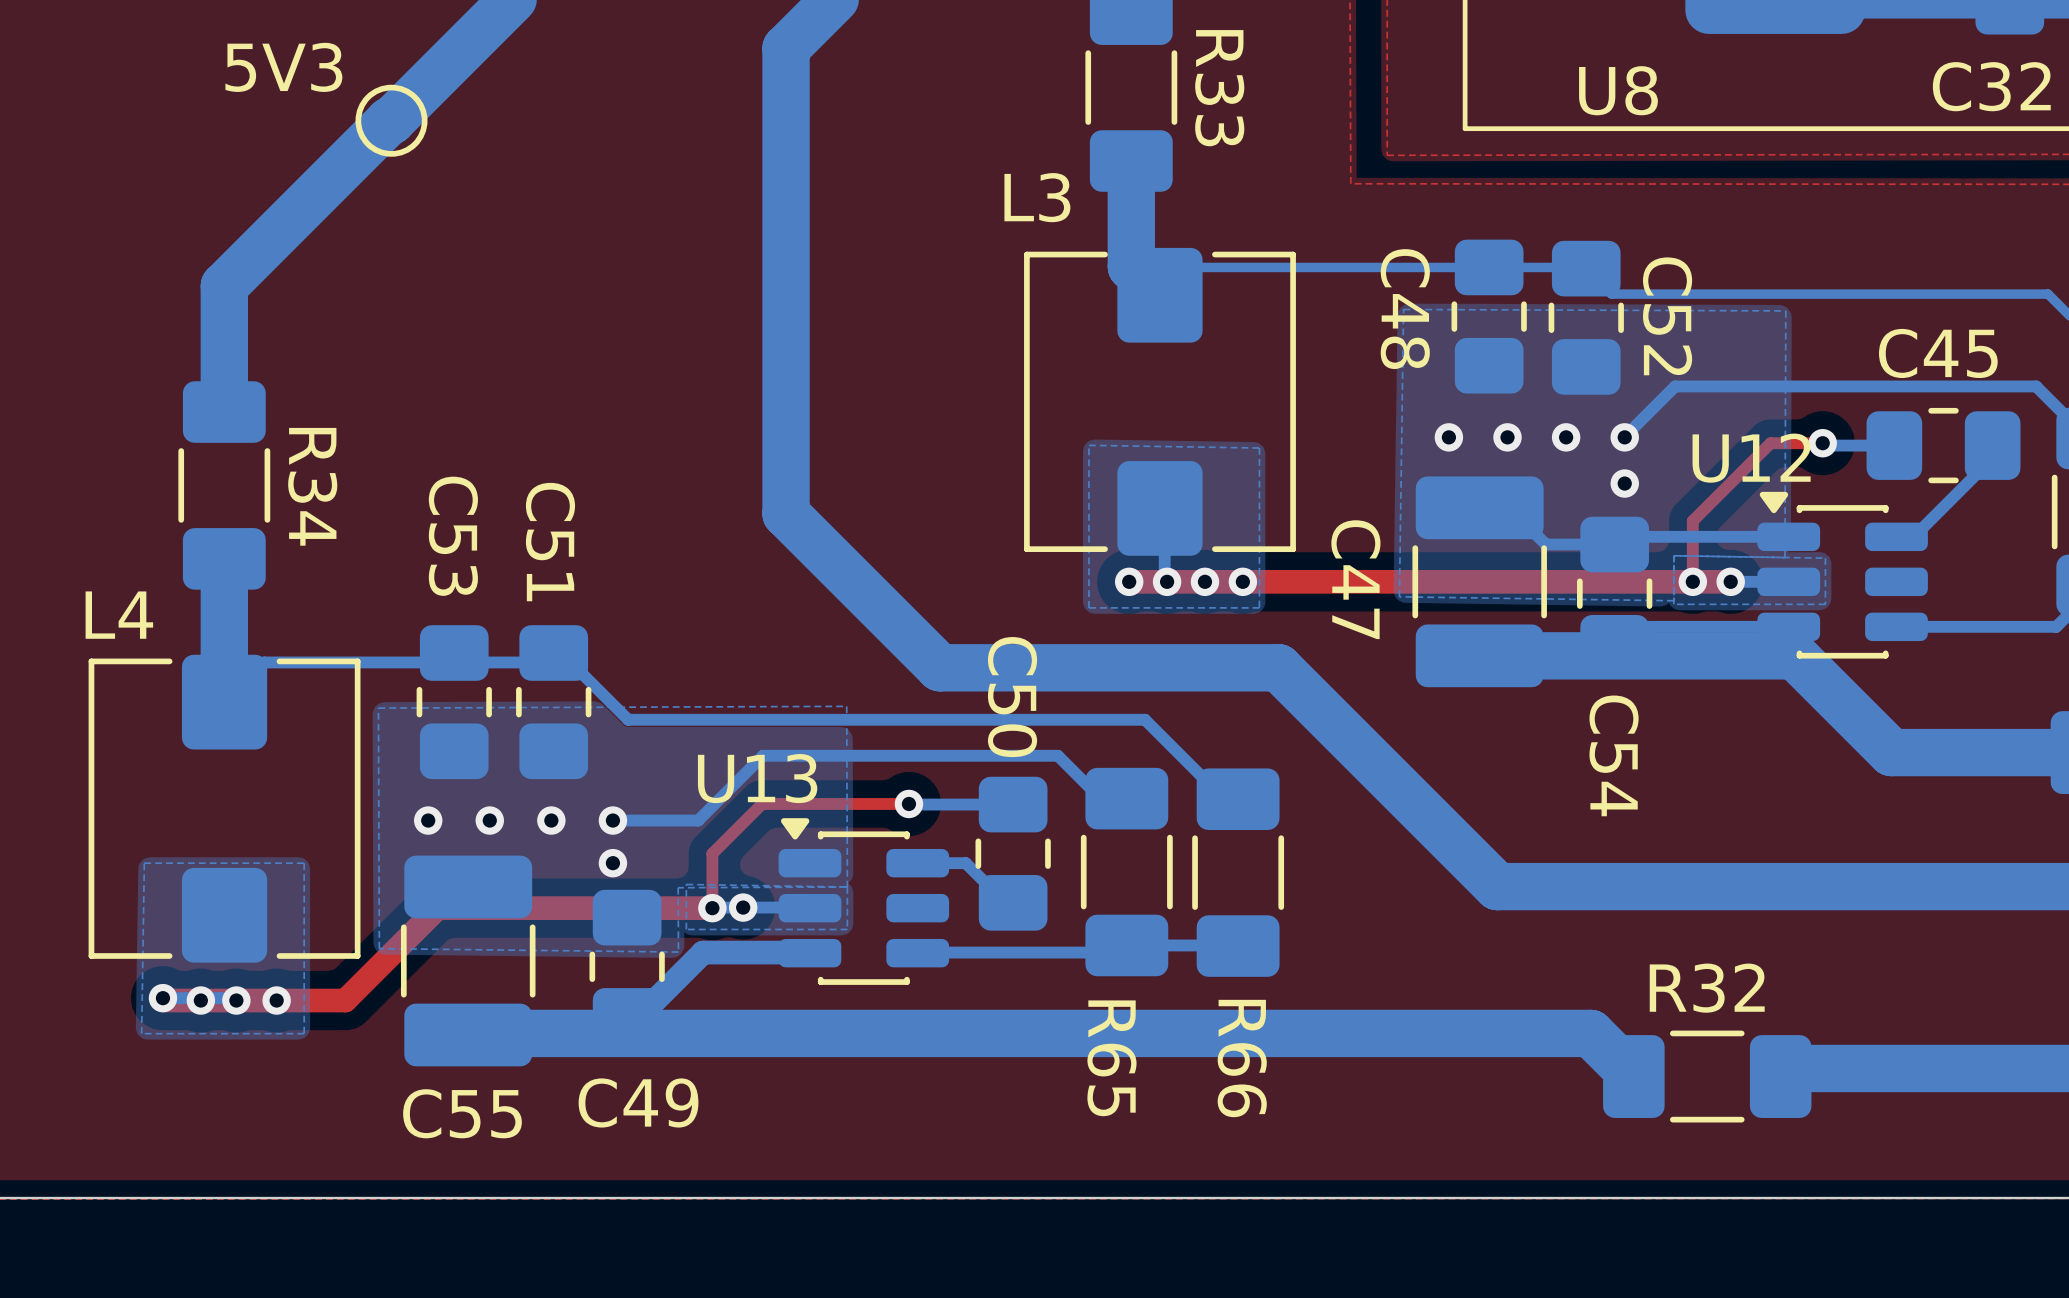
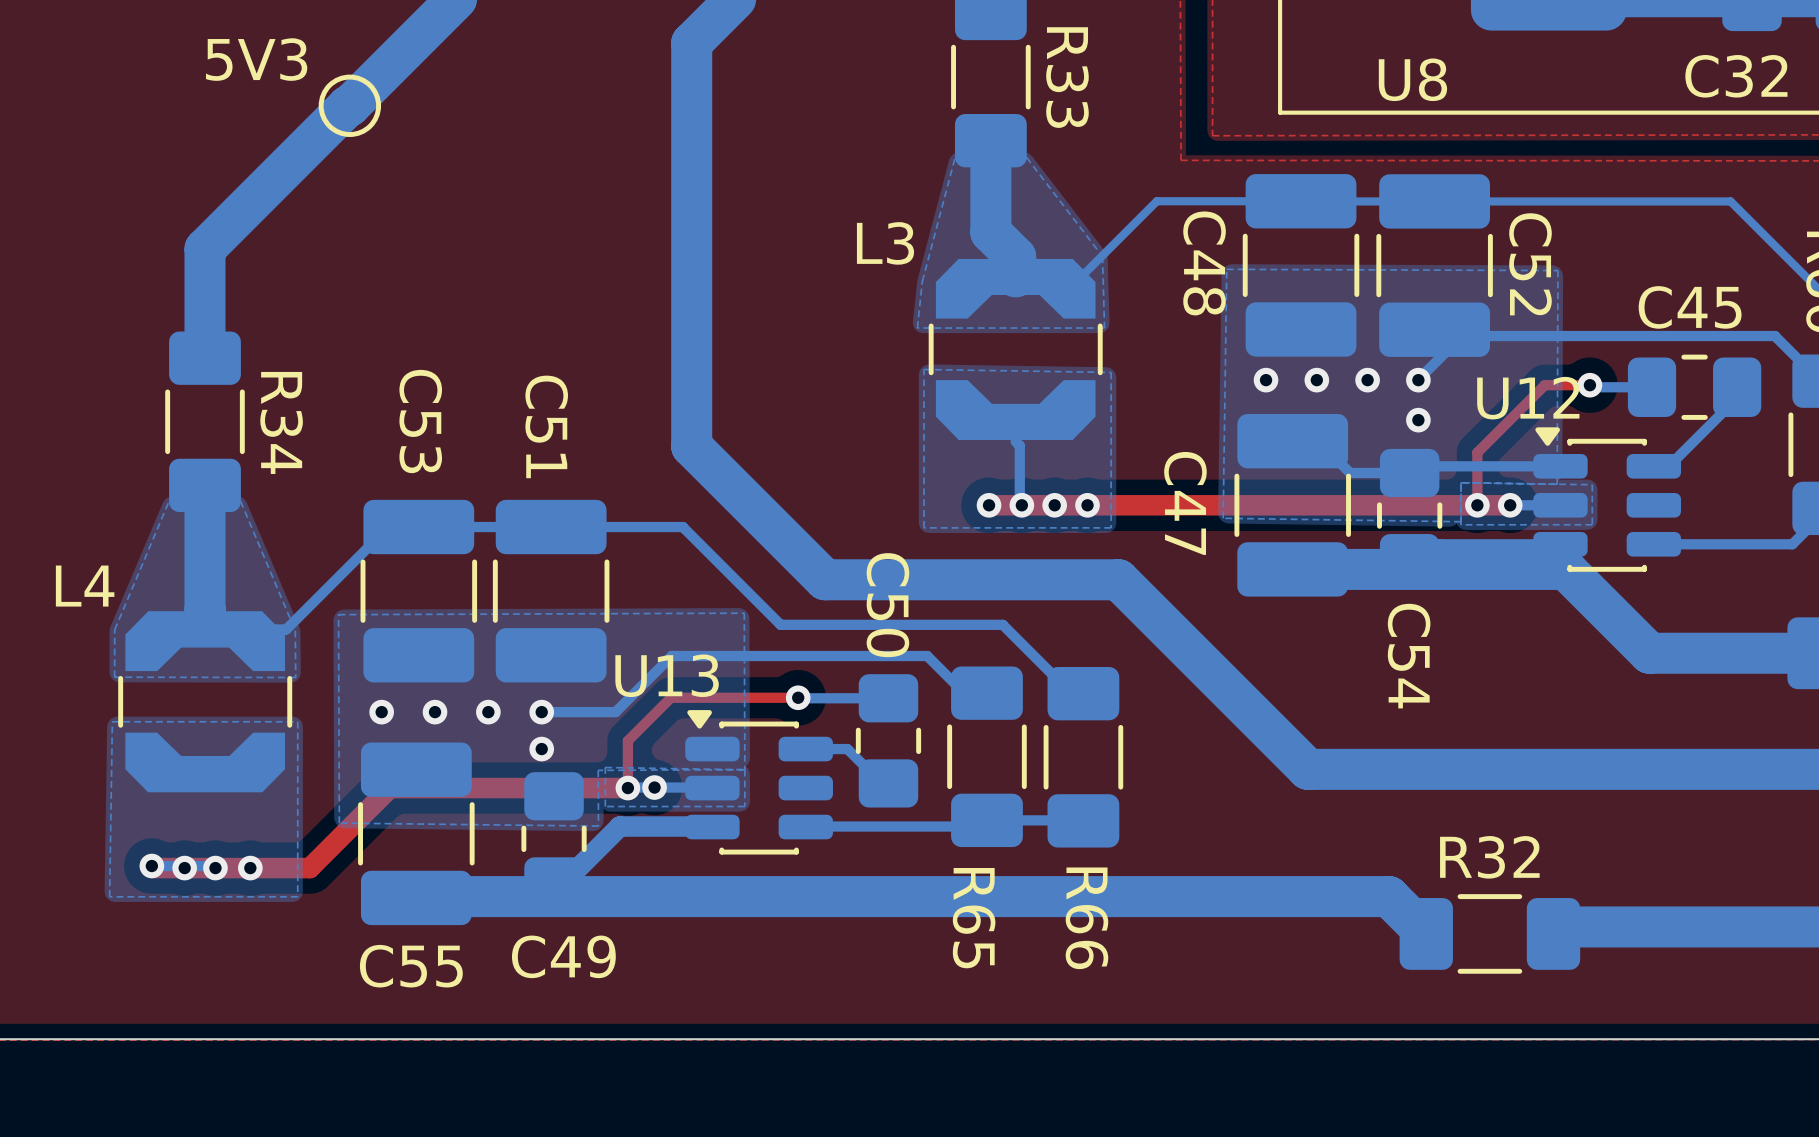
bottom zone outline: none -> (1026, 157) (955, 157) (922, 281) (917, 328) (1104, 328) (1102, 256) (1026, 157)
bottom track: none -> (1301, 201) (1156, 201) (1076, 281) (1068, 281)
C48 footprint: [1451, 239, 1527, 394] -> [1242, 174, 1360, 357]
C52 footprint: [1548, 240, 1624, 395] -> [1376, 174, 1493, 357]
L3 footprint: [1024, 247, 1296, 556] -> [928, 259, 1103, 440]
bottom track: (2048, 294) (1611, 294) (1585, 267) (1187, 267) (1159, 295) (1142, 295) -> (1785, 255) (1730, 201) (1301, 201)
bottom zone outline: none -> (240, 501) (168, 501) (114, 629) (114, 677) (295, 677) (295, 630) (240, 501)
bottom zone outline: (1259, 607) (1259, 448) (1088, 445) (1088, 607) -> (1101, 527) (1111, 527) (1111, 372) (923, 369) (923, 527) (954, 527)
C53 footprint: [416, 625, 492, 780] -> [360, 499, 478, 683]
C51 footprint: [516, 625, 592, 780] -> [492, 499, 610, 683]
L4 footprint: [88, 654, 361, 963] -> [118, 611, 293, 793]
bottom track: (229, 697) (224, 702) (264, 662) (570, 662) (628, 719) (888, 719) -> (205, 629) (286, 629) (388, 527) (682, 527) (780, 624)
bottom zone outline: (304, 1033) (304, 863) (144, 863) (141, 1033) -> (274, 896) (297, 896) (297, 721) (112, 721) (109, 896) (133, 896)

